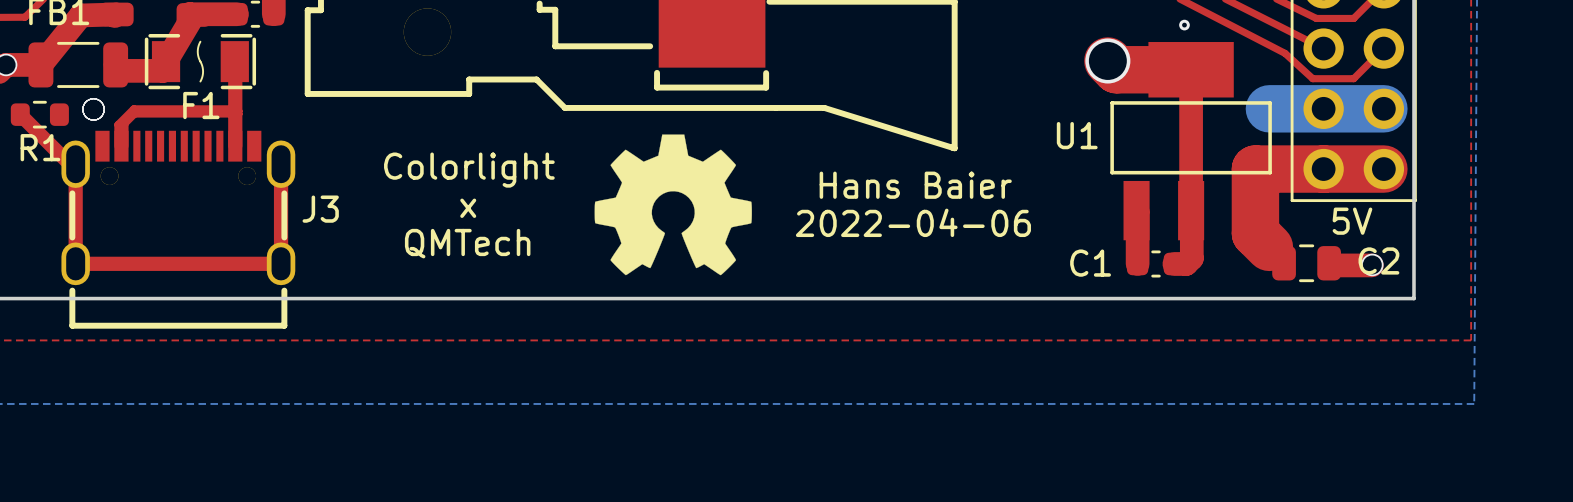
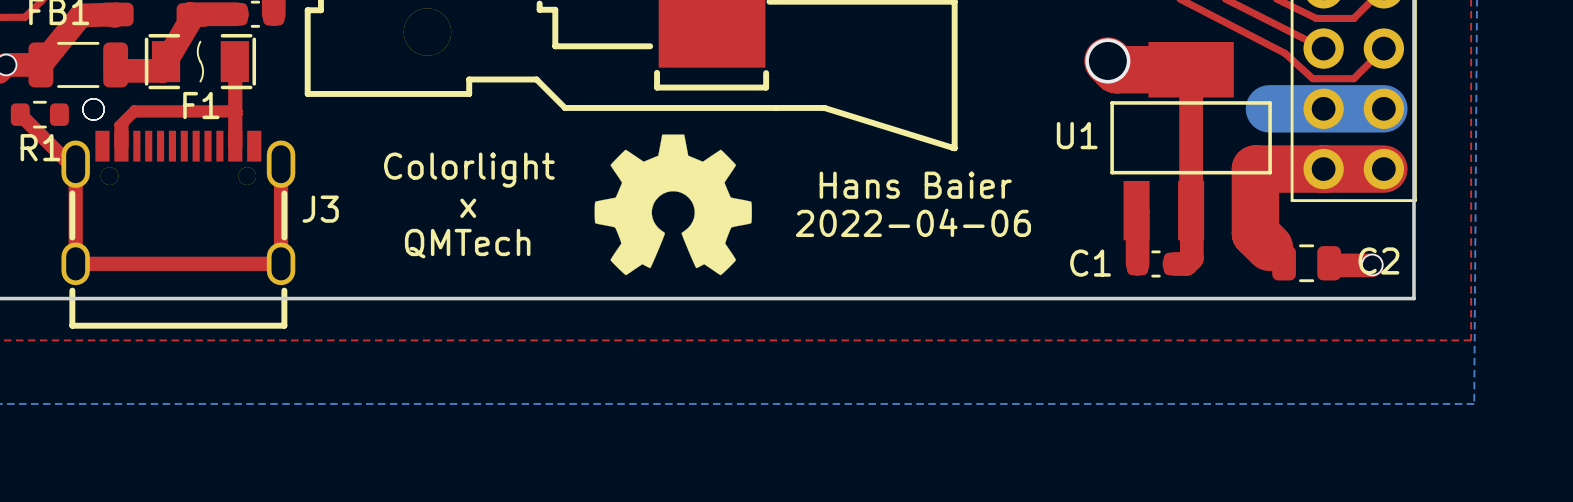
via: (1184, 25) -> none
text: 5V (1352, 221) -> none

